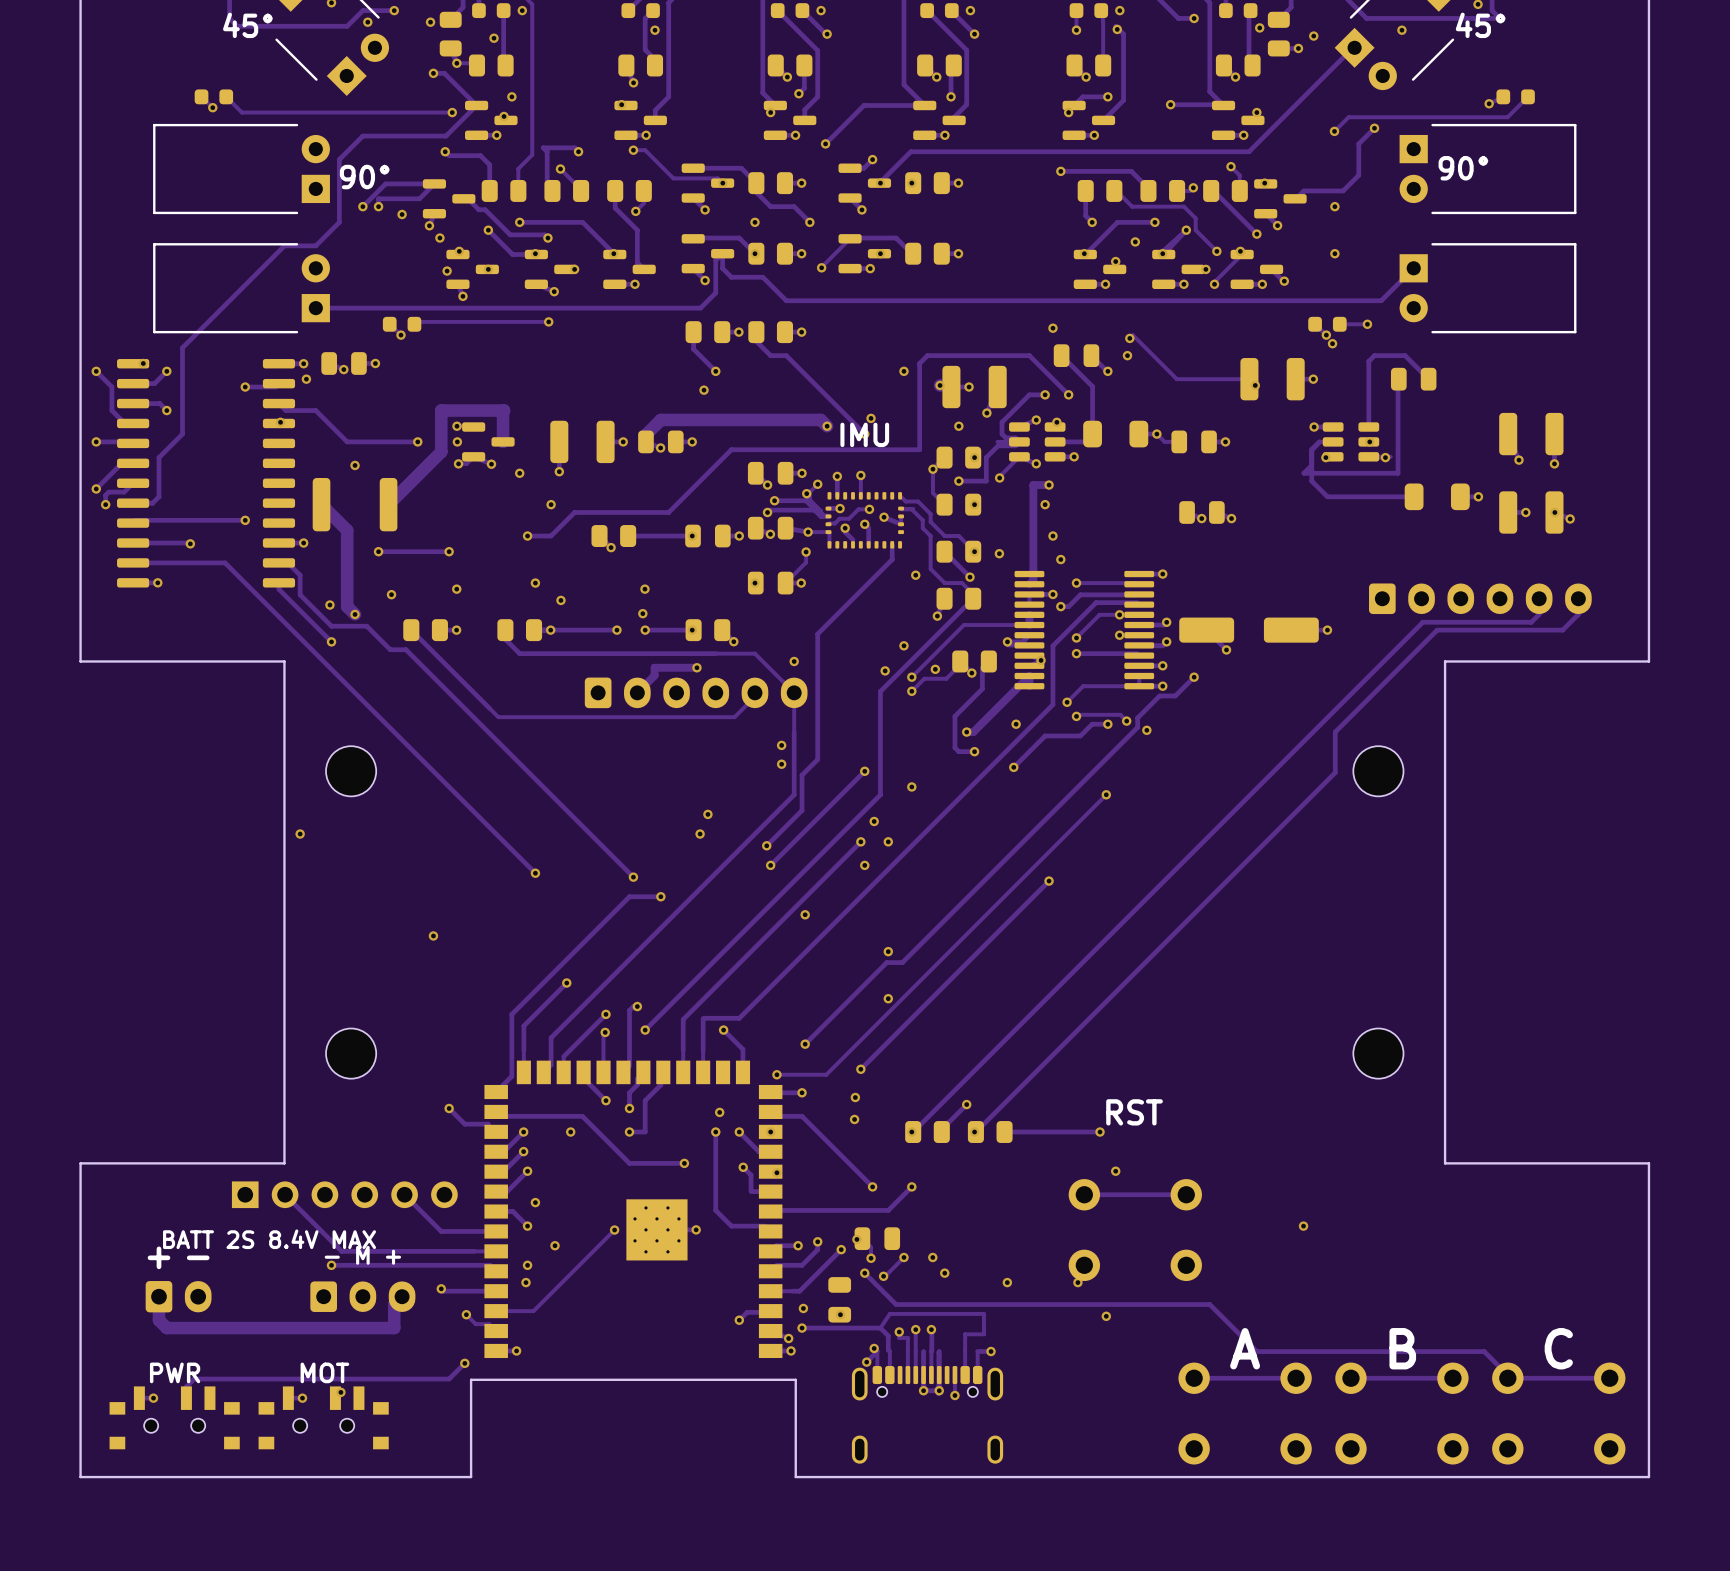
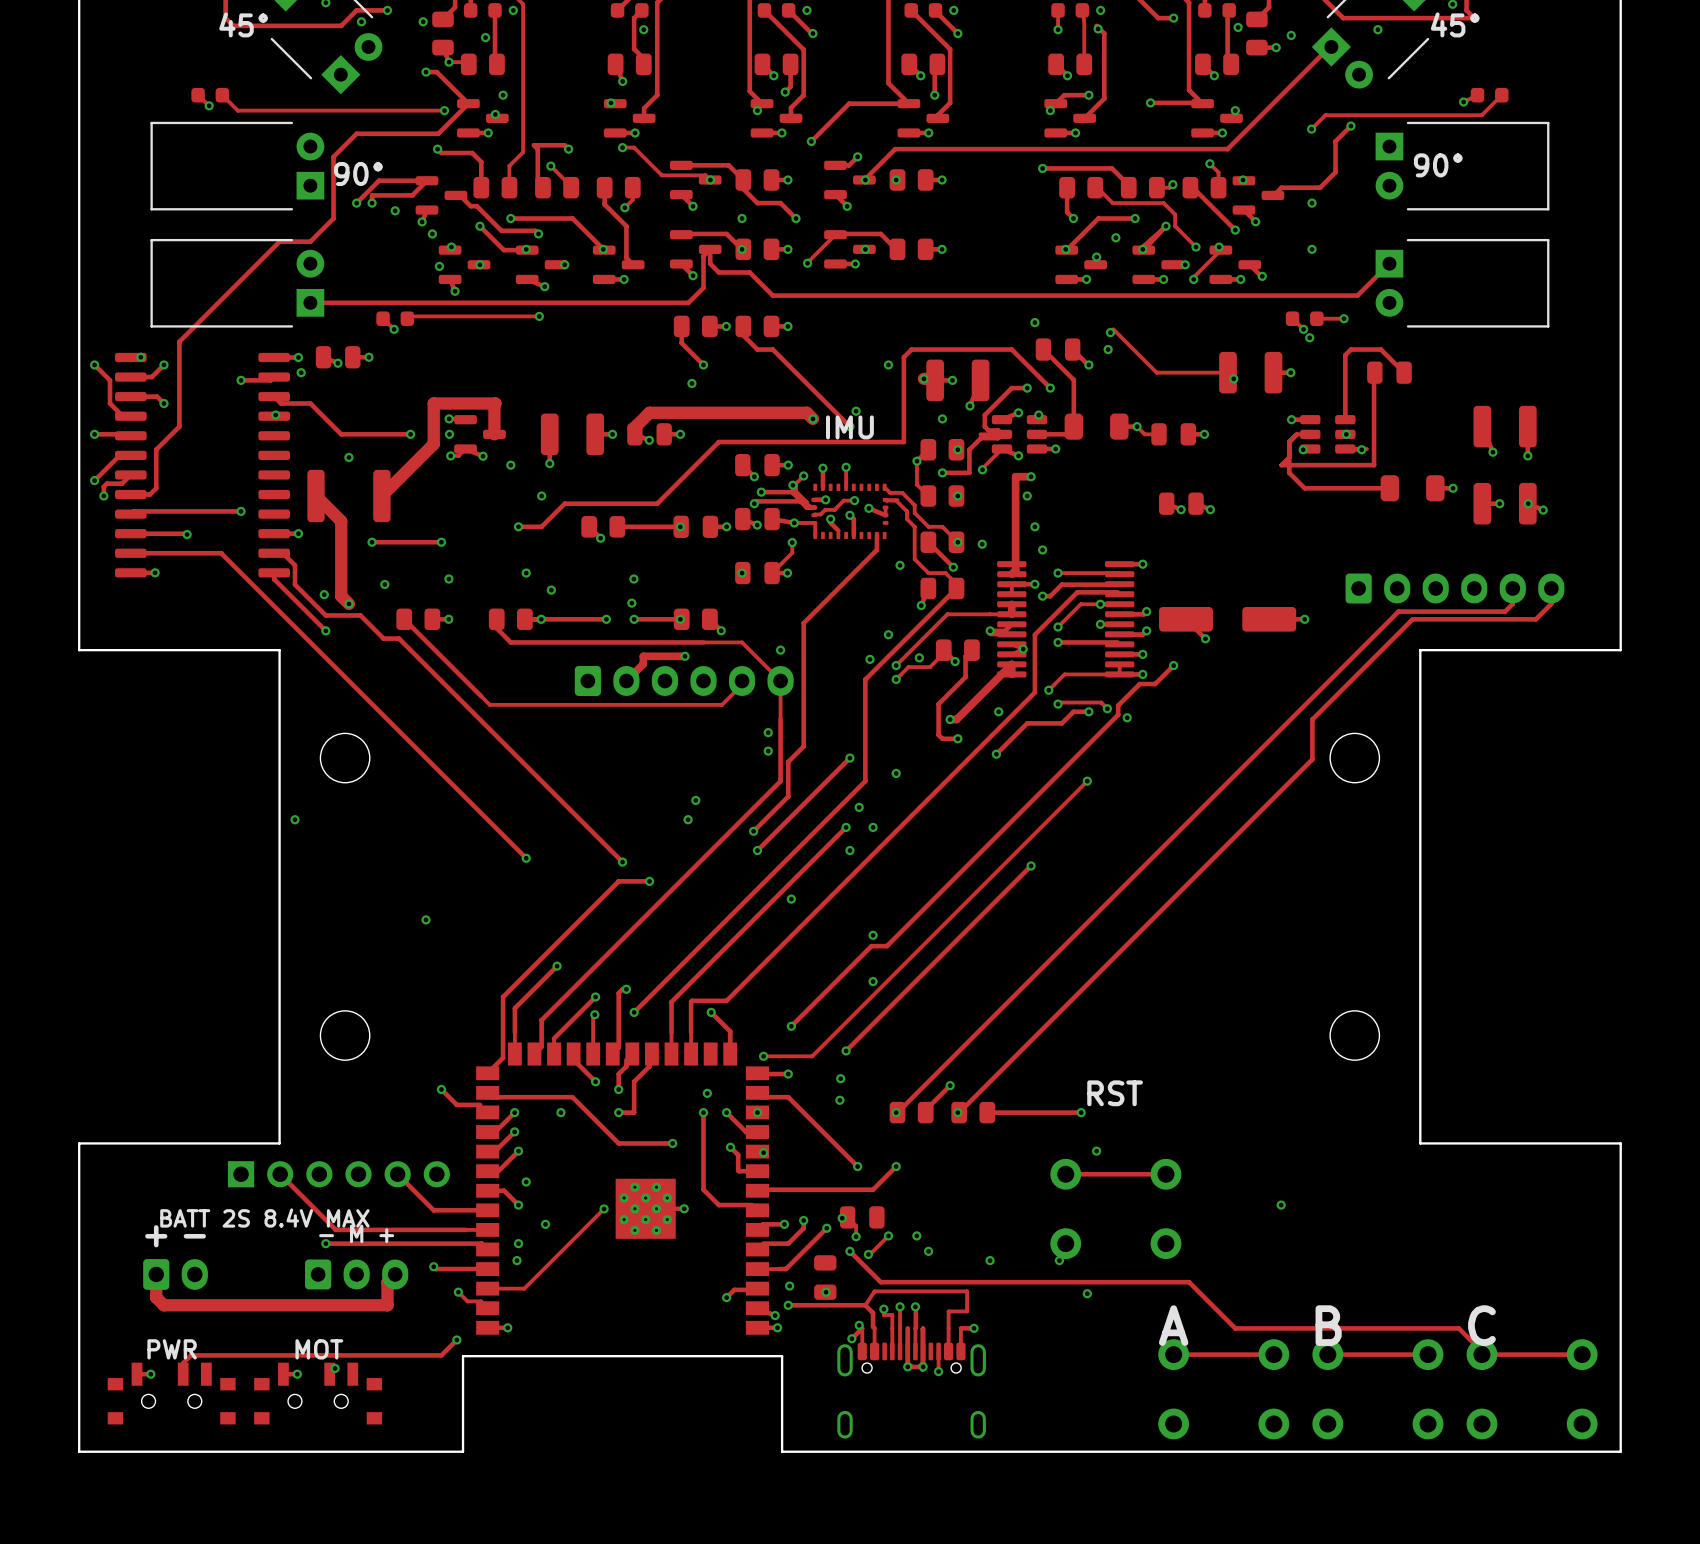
text position: A (1245, 1348) -> A (1173, 1325)
text position: B (1402, 1348) -> B (1328, 1325)
text position: C (1558, 1348) -> C (1481, 1325)

